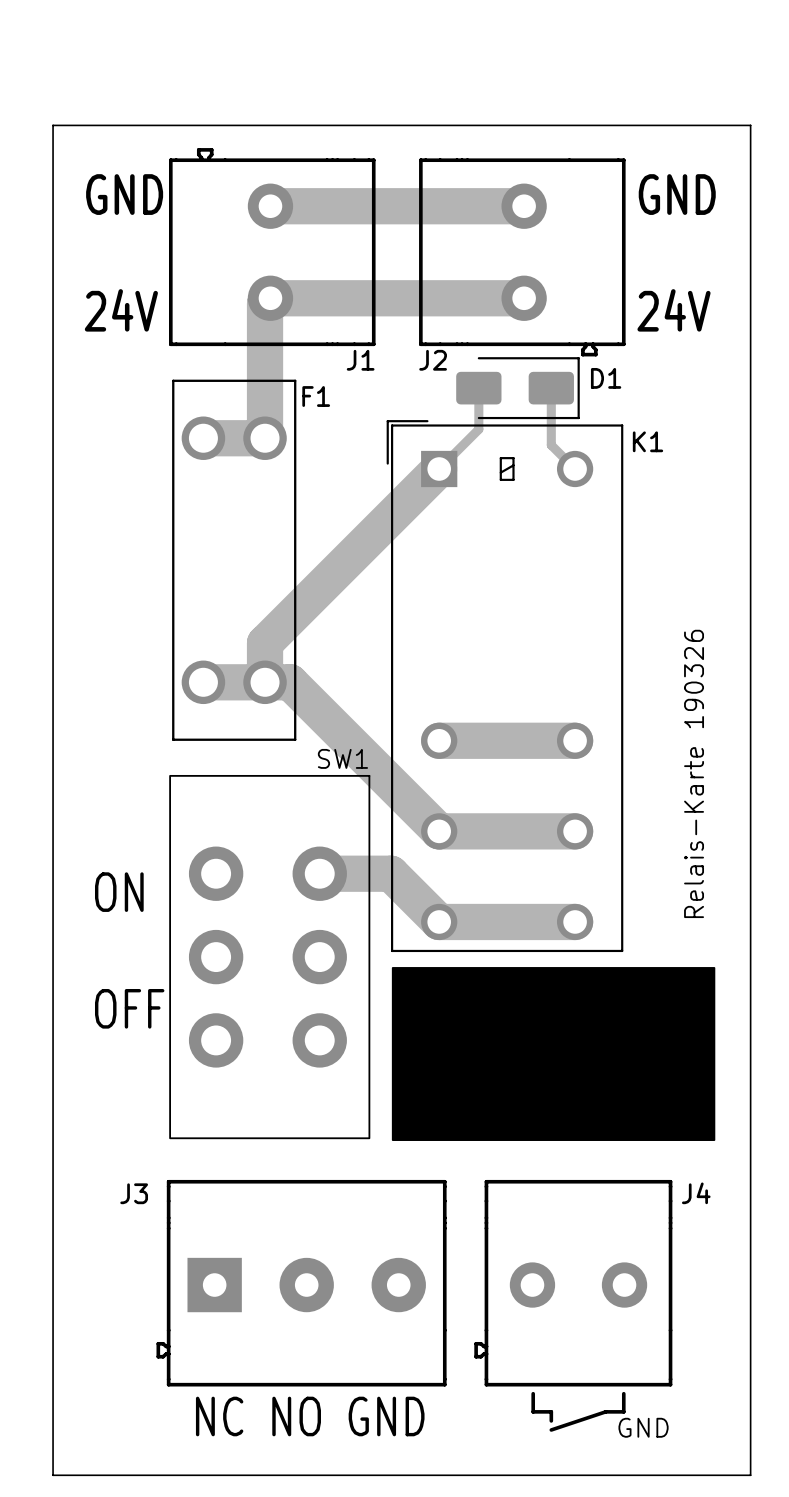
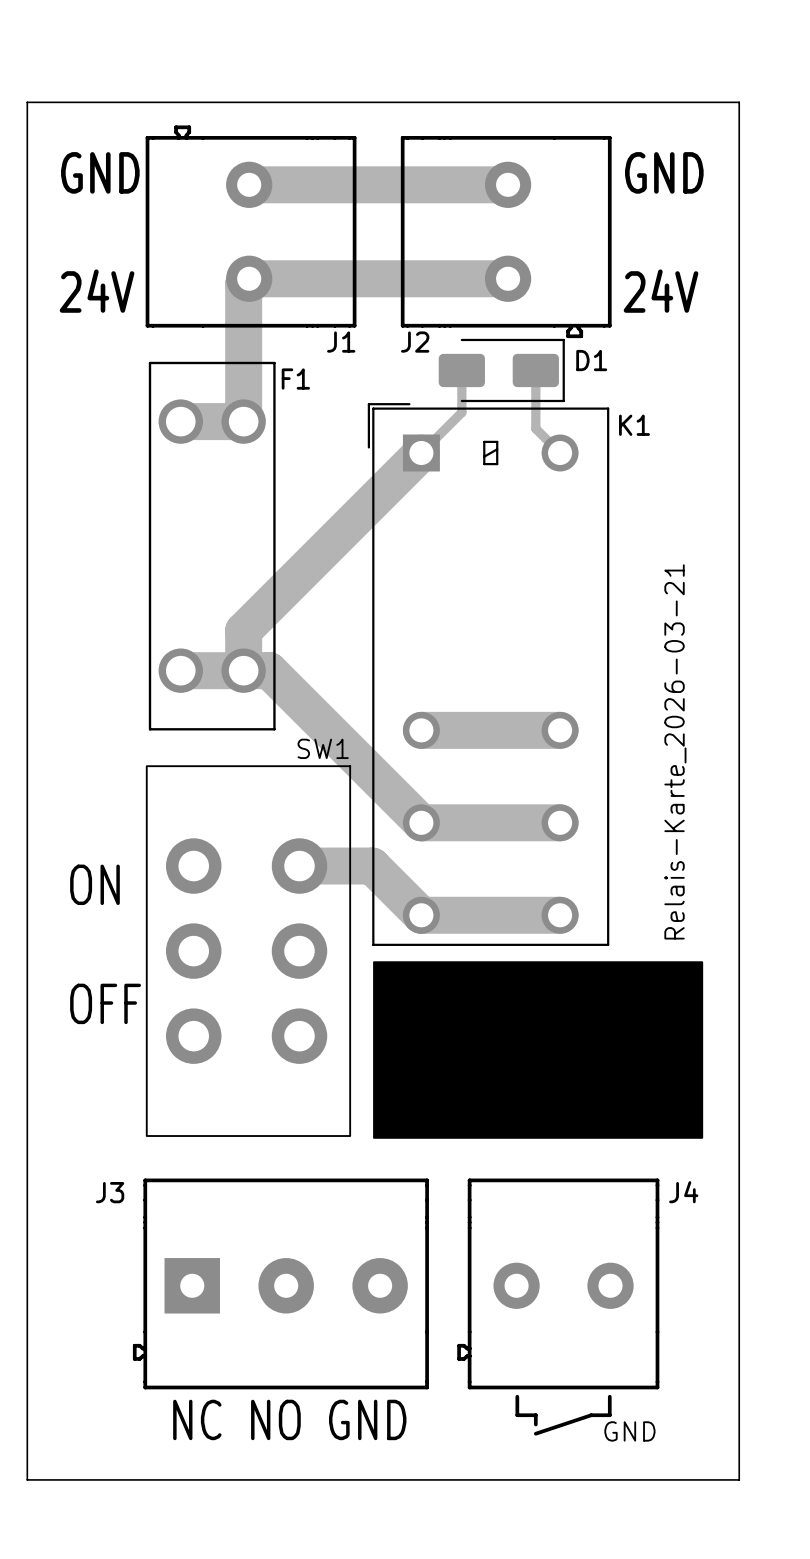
drawing: none -> [664, 564, 687, 940]
text: Relais-Karte 190326 (694, 773) -> none

